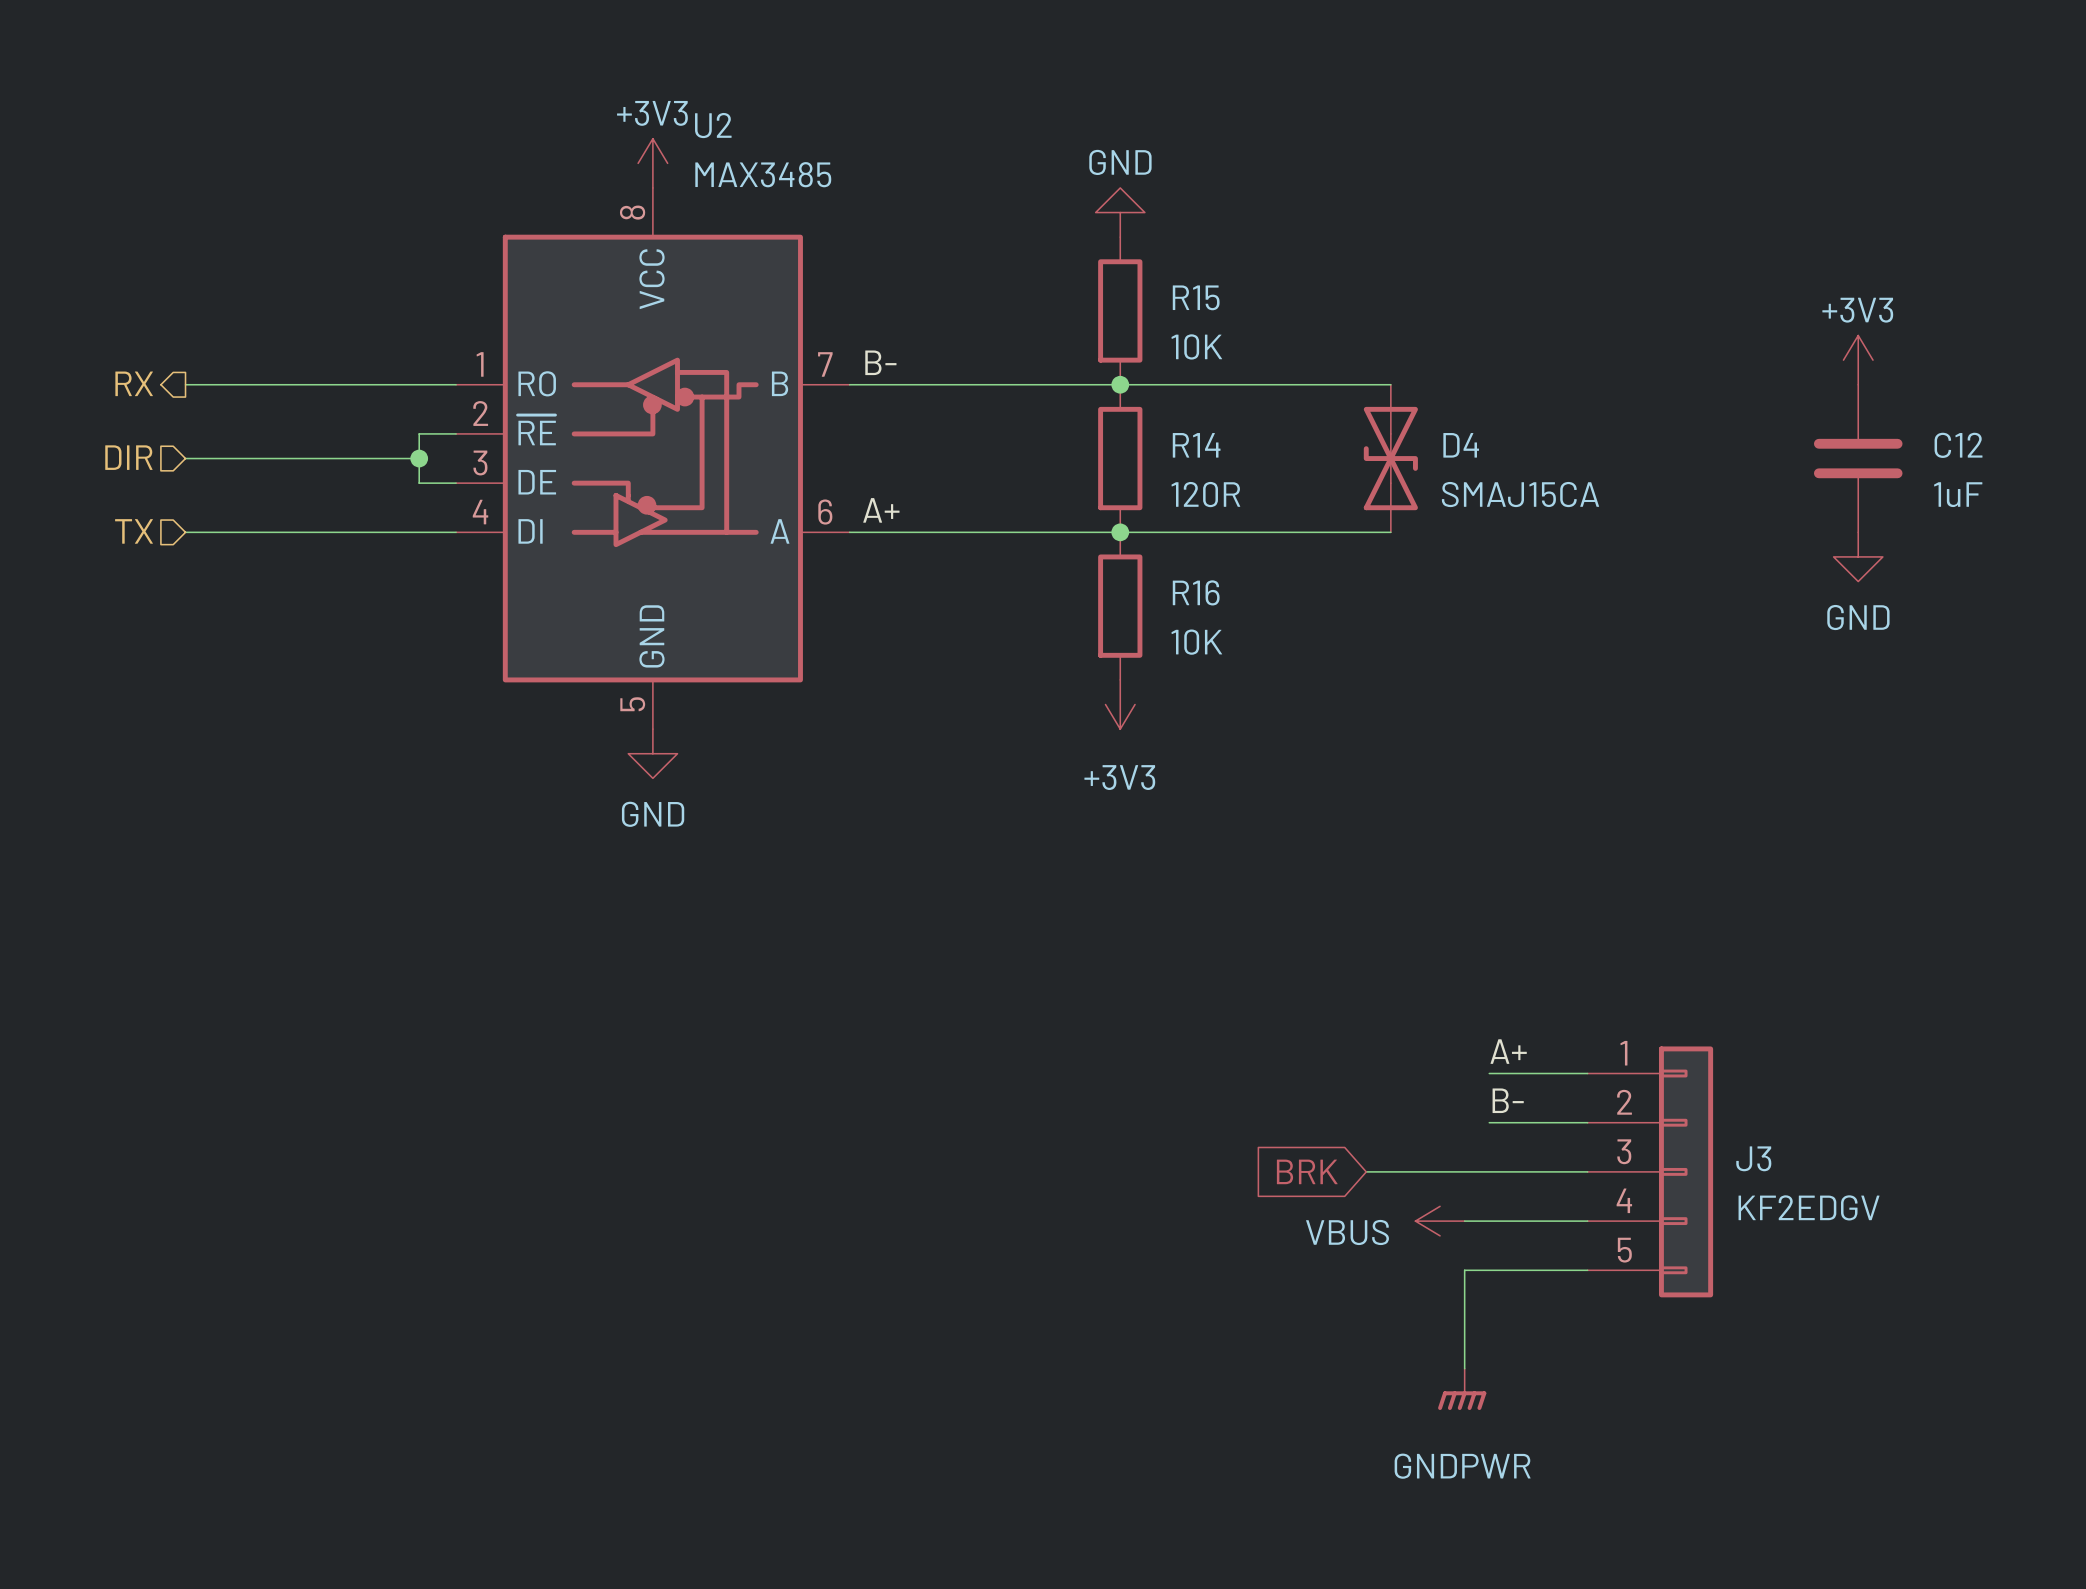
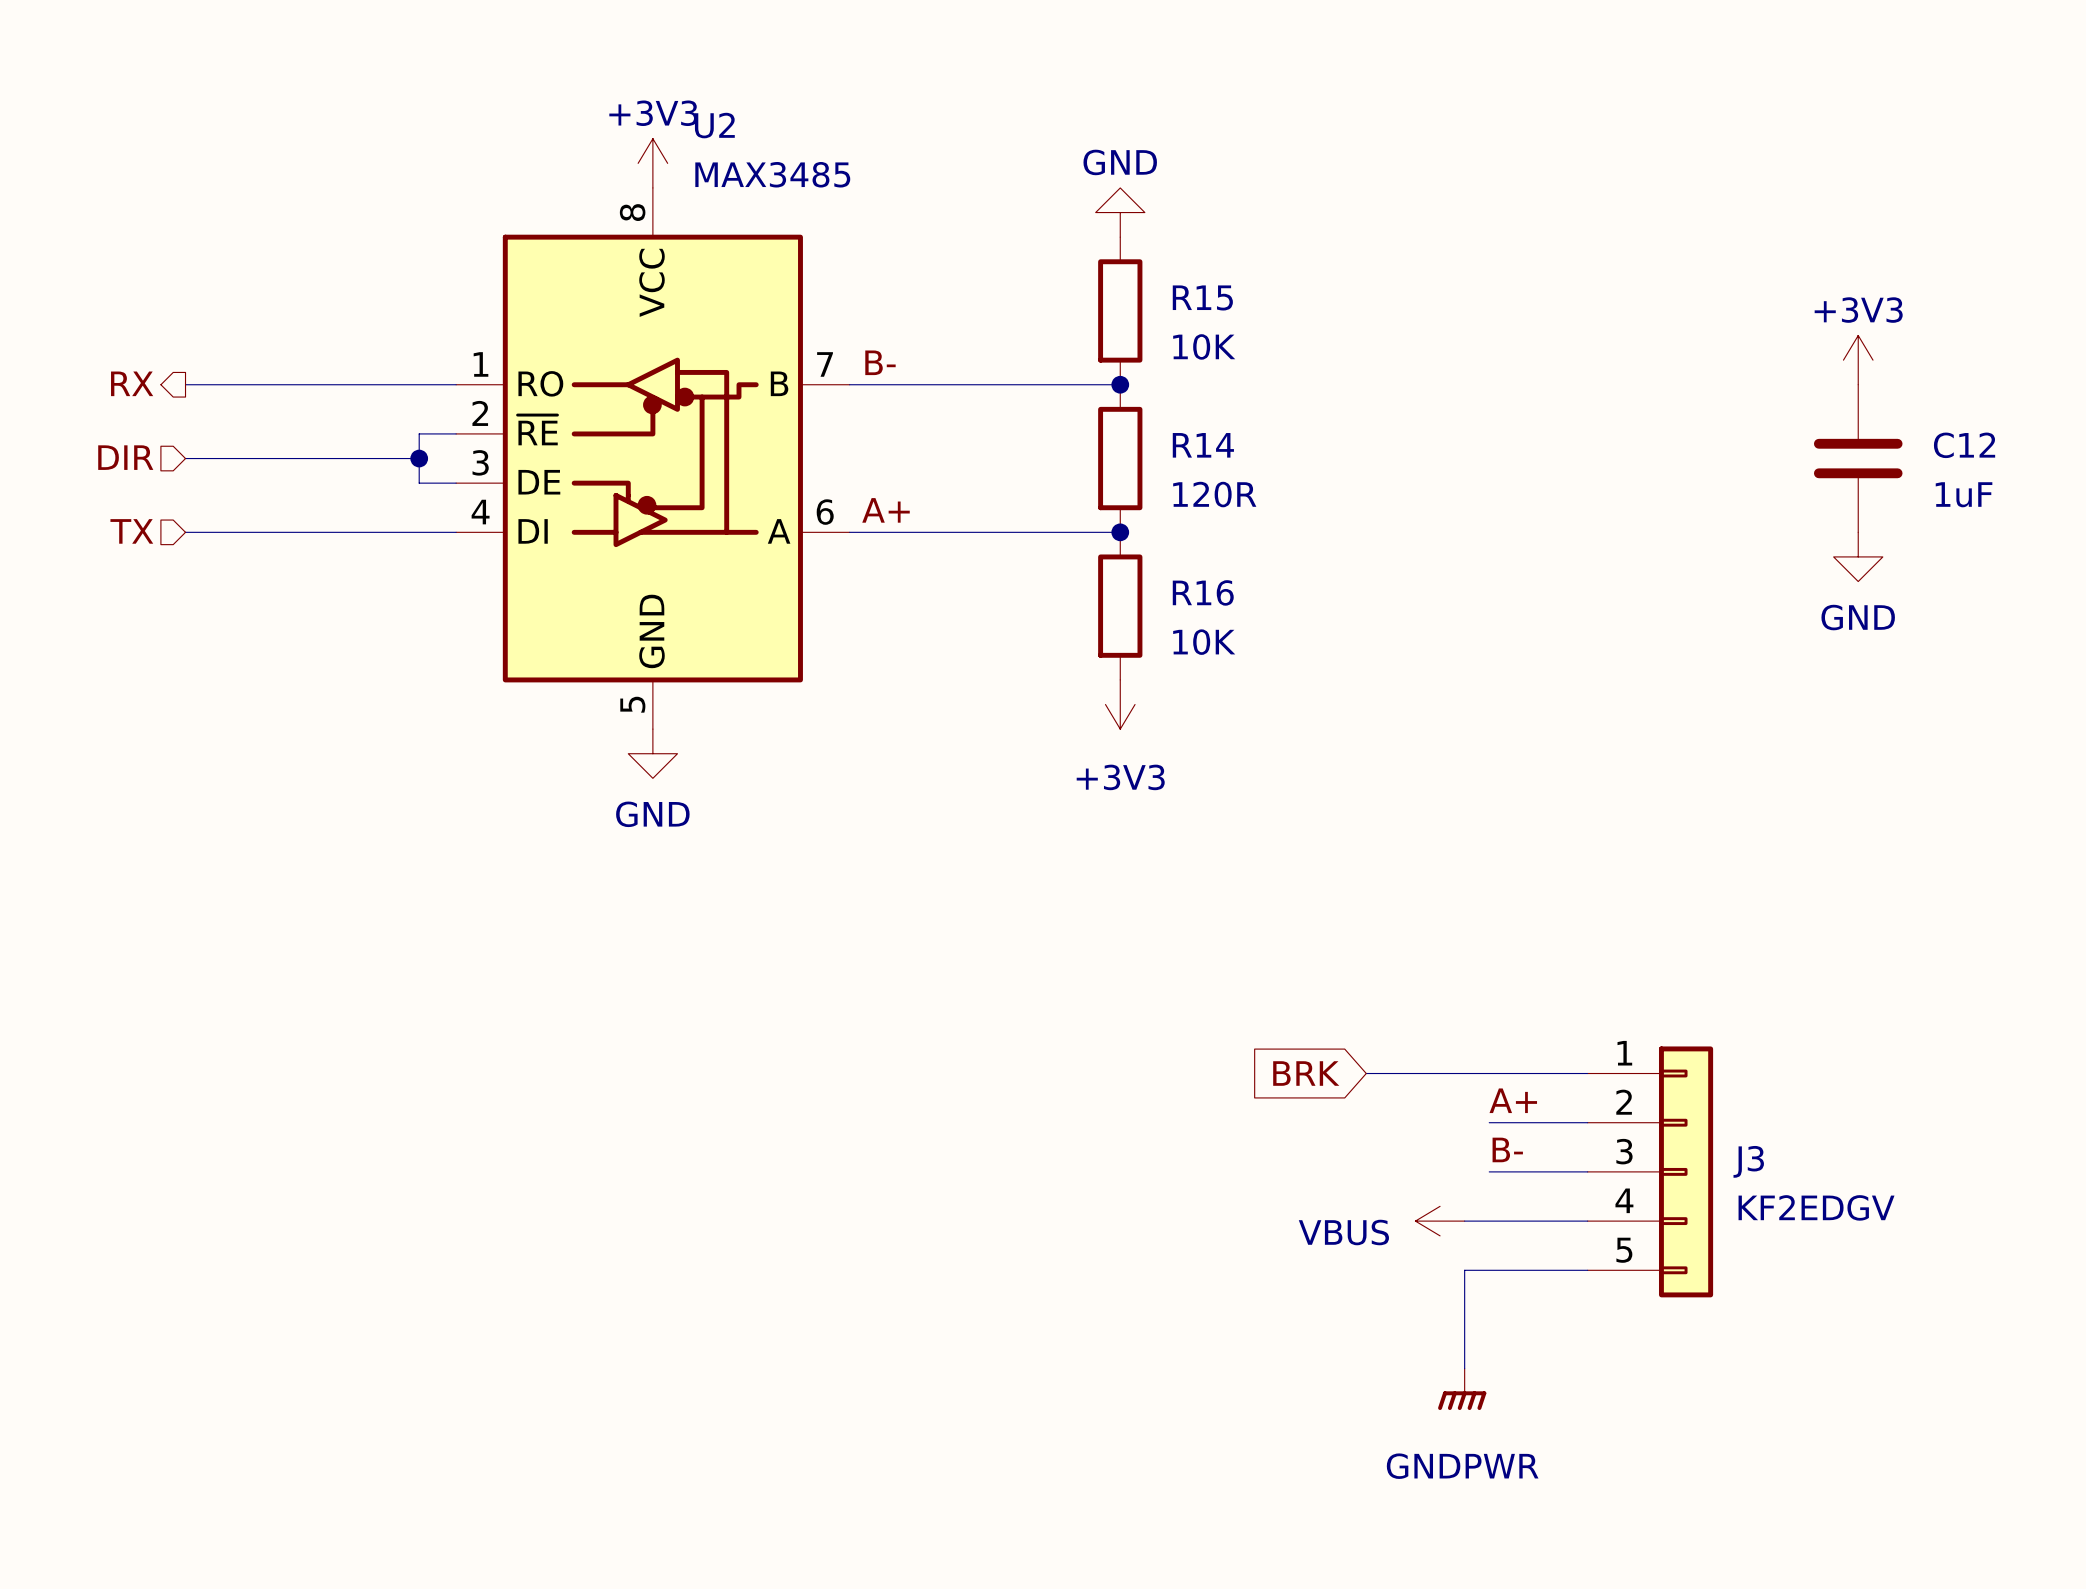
wire: (1120, 384) (1390, 384) -> none
D4: SMAJ15CA (1390, 458) -> none
wire: (1120, 532) (1390, 532) -> none
label: A+ (1508, 1051) -> none
label: B- (1508, 1100) -> A+ (1513, 1100)
label: none -> B- (1507, 1149)
global label position: BRK (1307, 1171) -> BRK (1306, 1073)
wire: (1366, 1171) (1489, 1171) -> (1366, 1073) (1489, 1073)

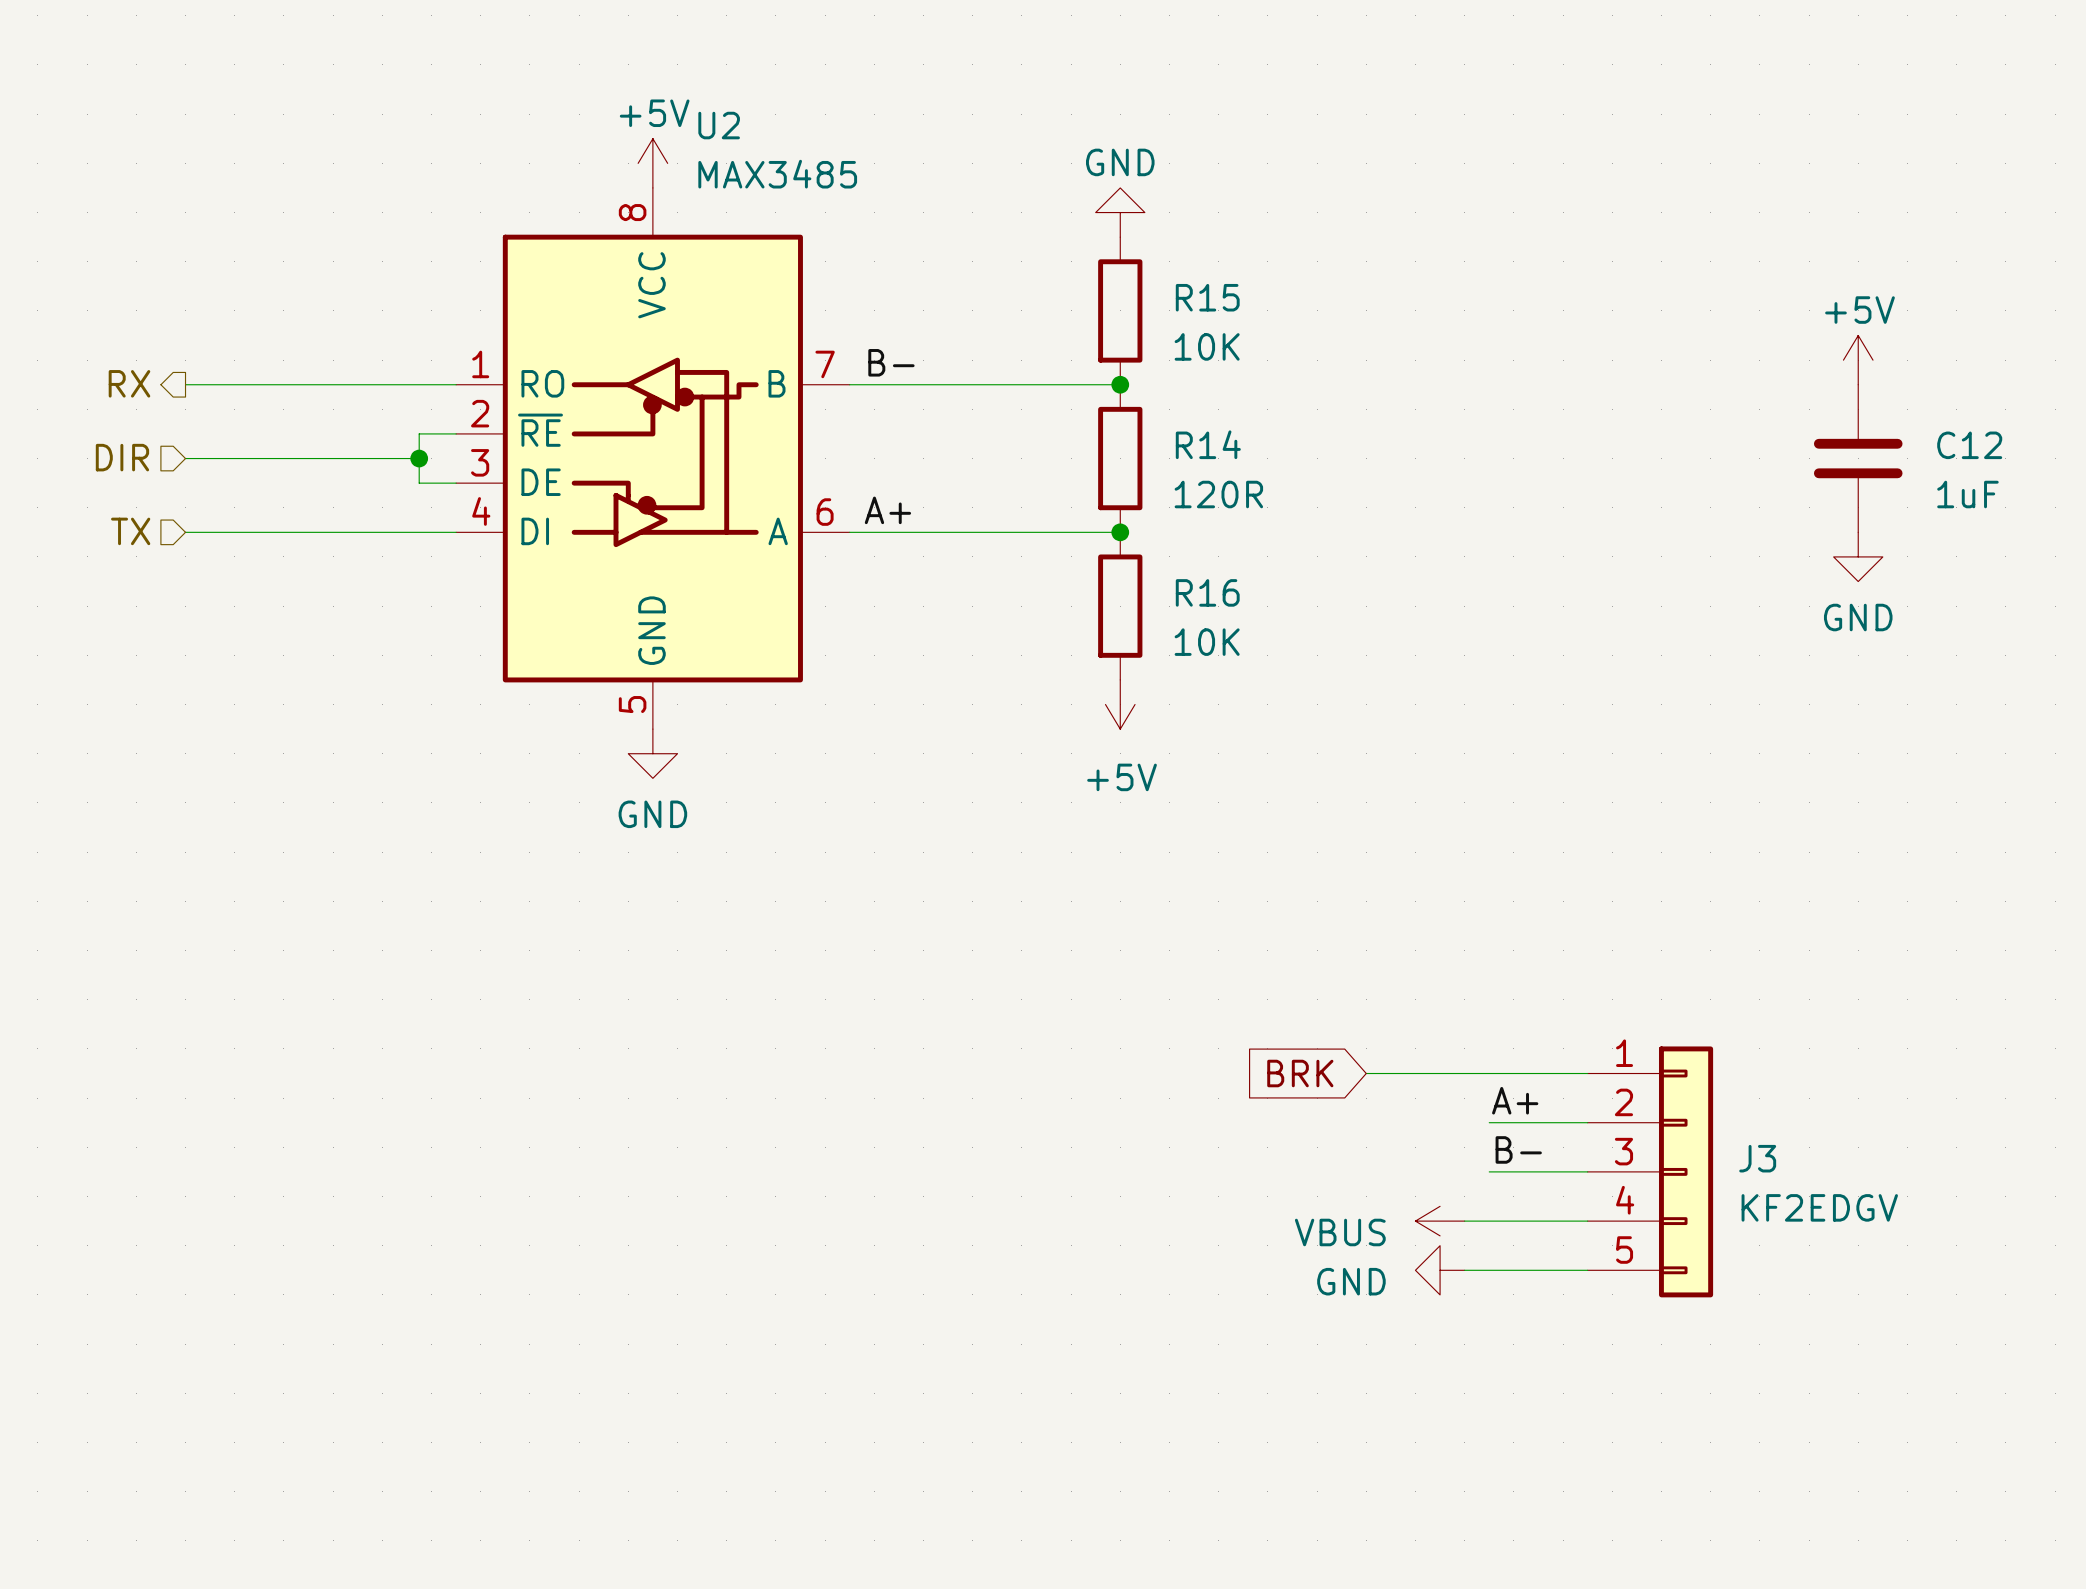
power symbol: +3V3 (652, 163) -> +5V (652, 163)
power symbol: +3V3 (1858, 360) -> +5V (1858, 360)
power symbol: +3V3 (1120, 704) -> +5V (1120, 704)
power symbol: none -> GND (1440, 1270)
wire: (1464, 1270) (1464, 1368) -> none
power symbol: GNDPWR (1462, 1389) -> none

